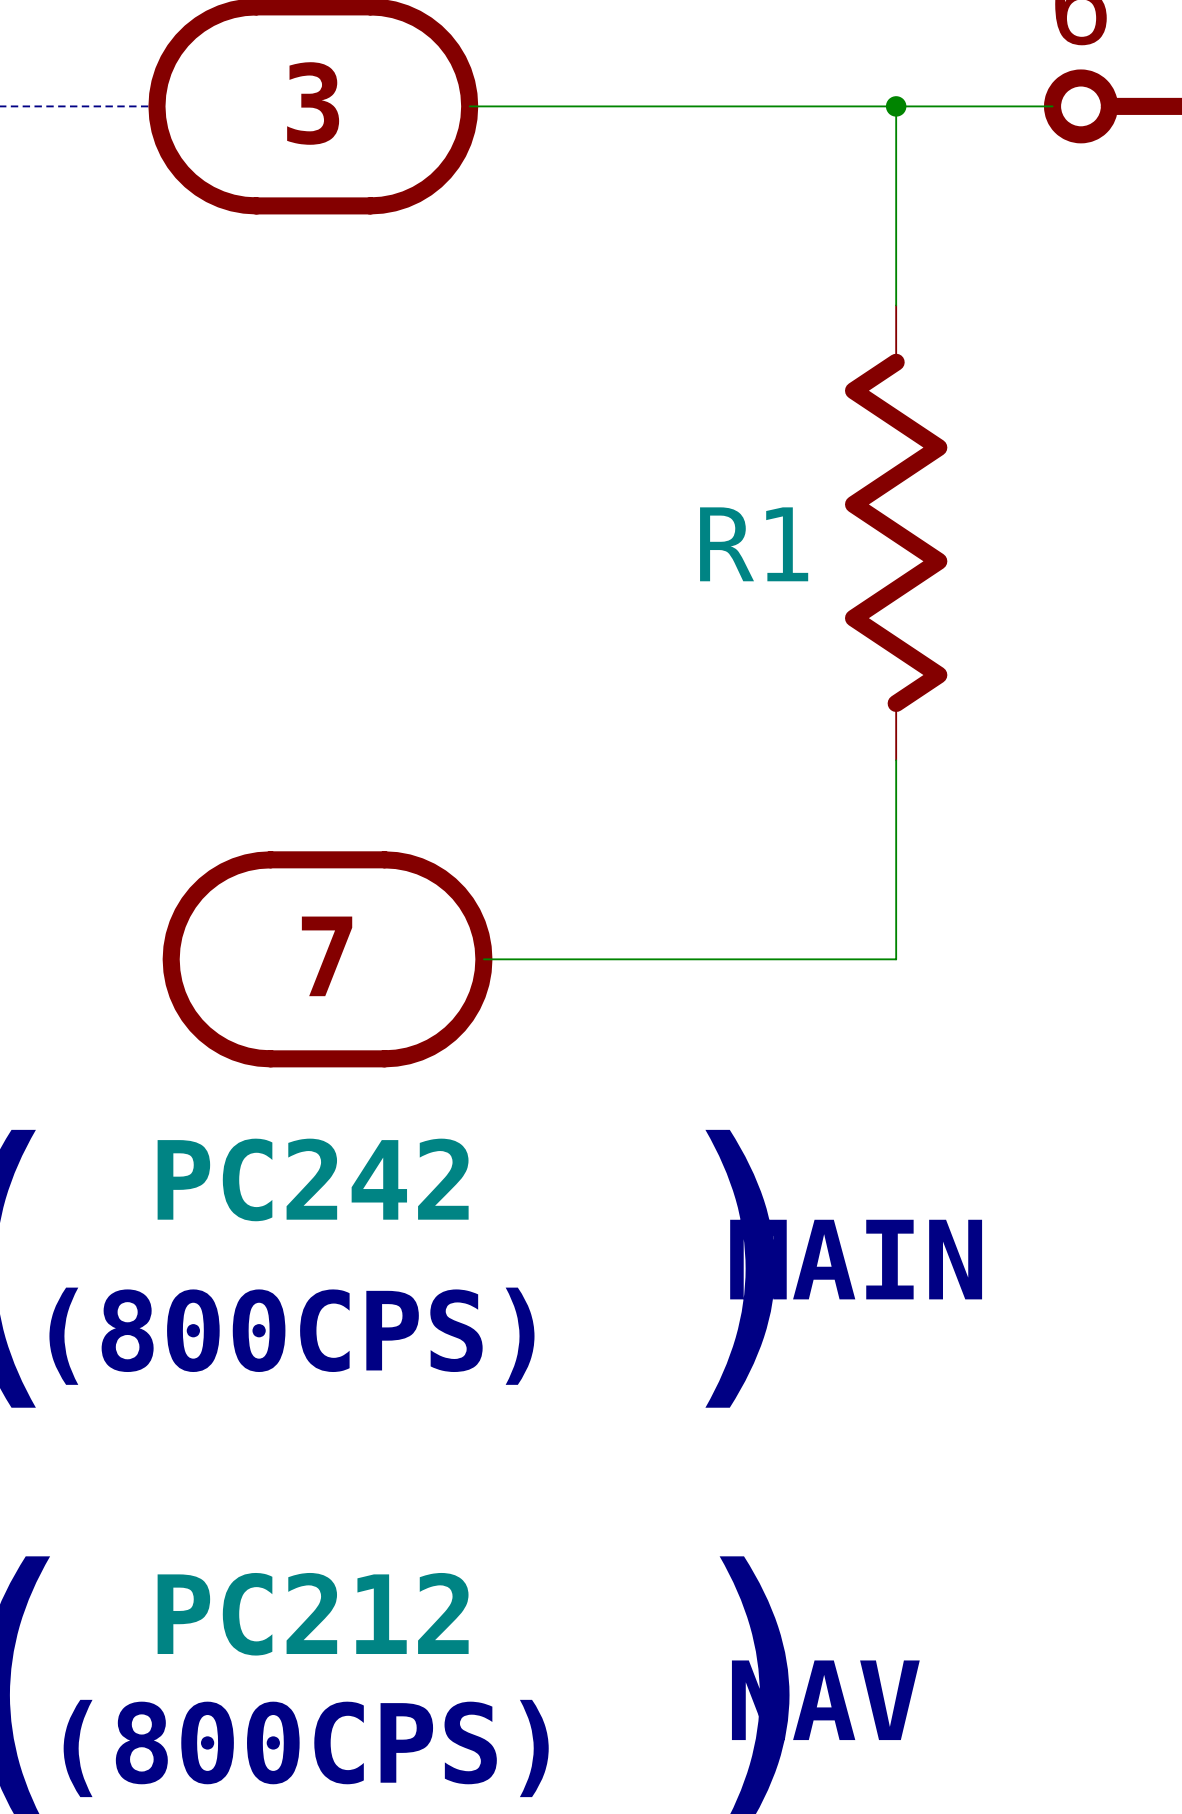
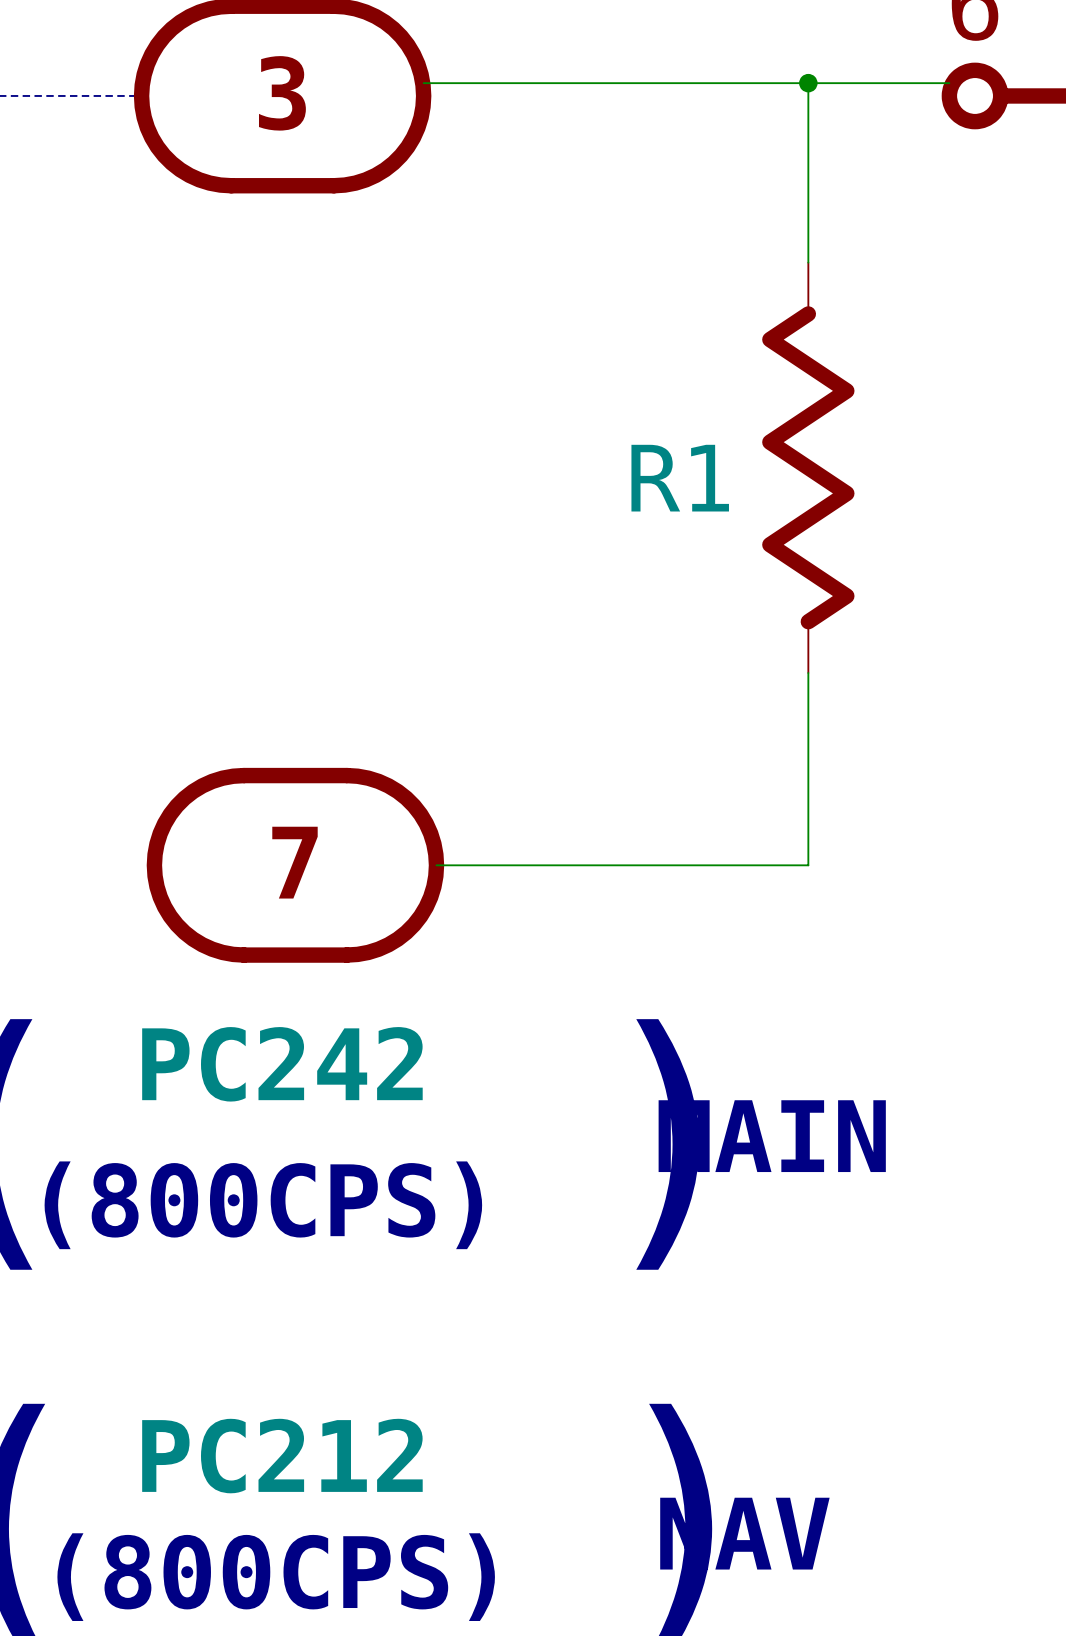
wire: (469, 106) (1052, 106) -> (423, 83) (949, 83)
junction position: (896, 106) -> (808, 83)
R1 position: (896, 532) -> (808, 467)

